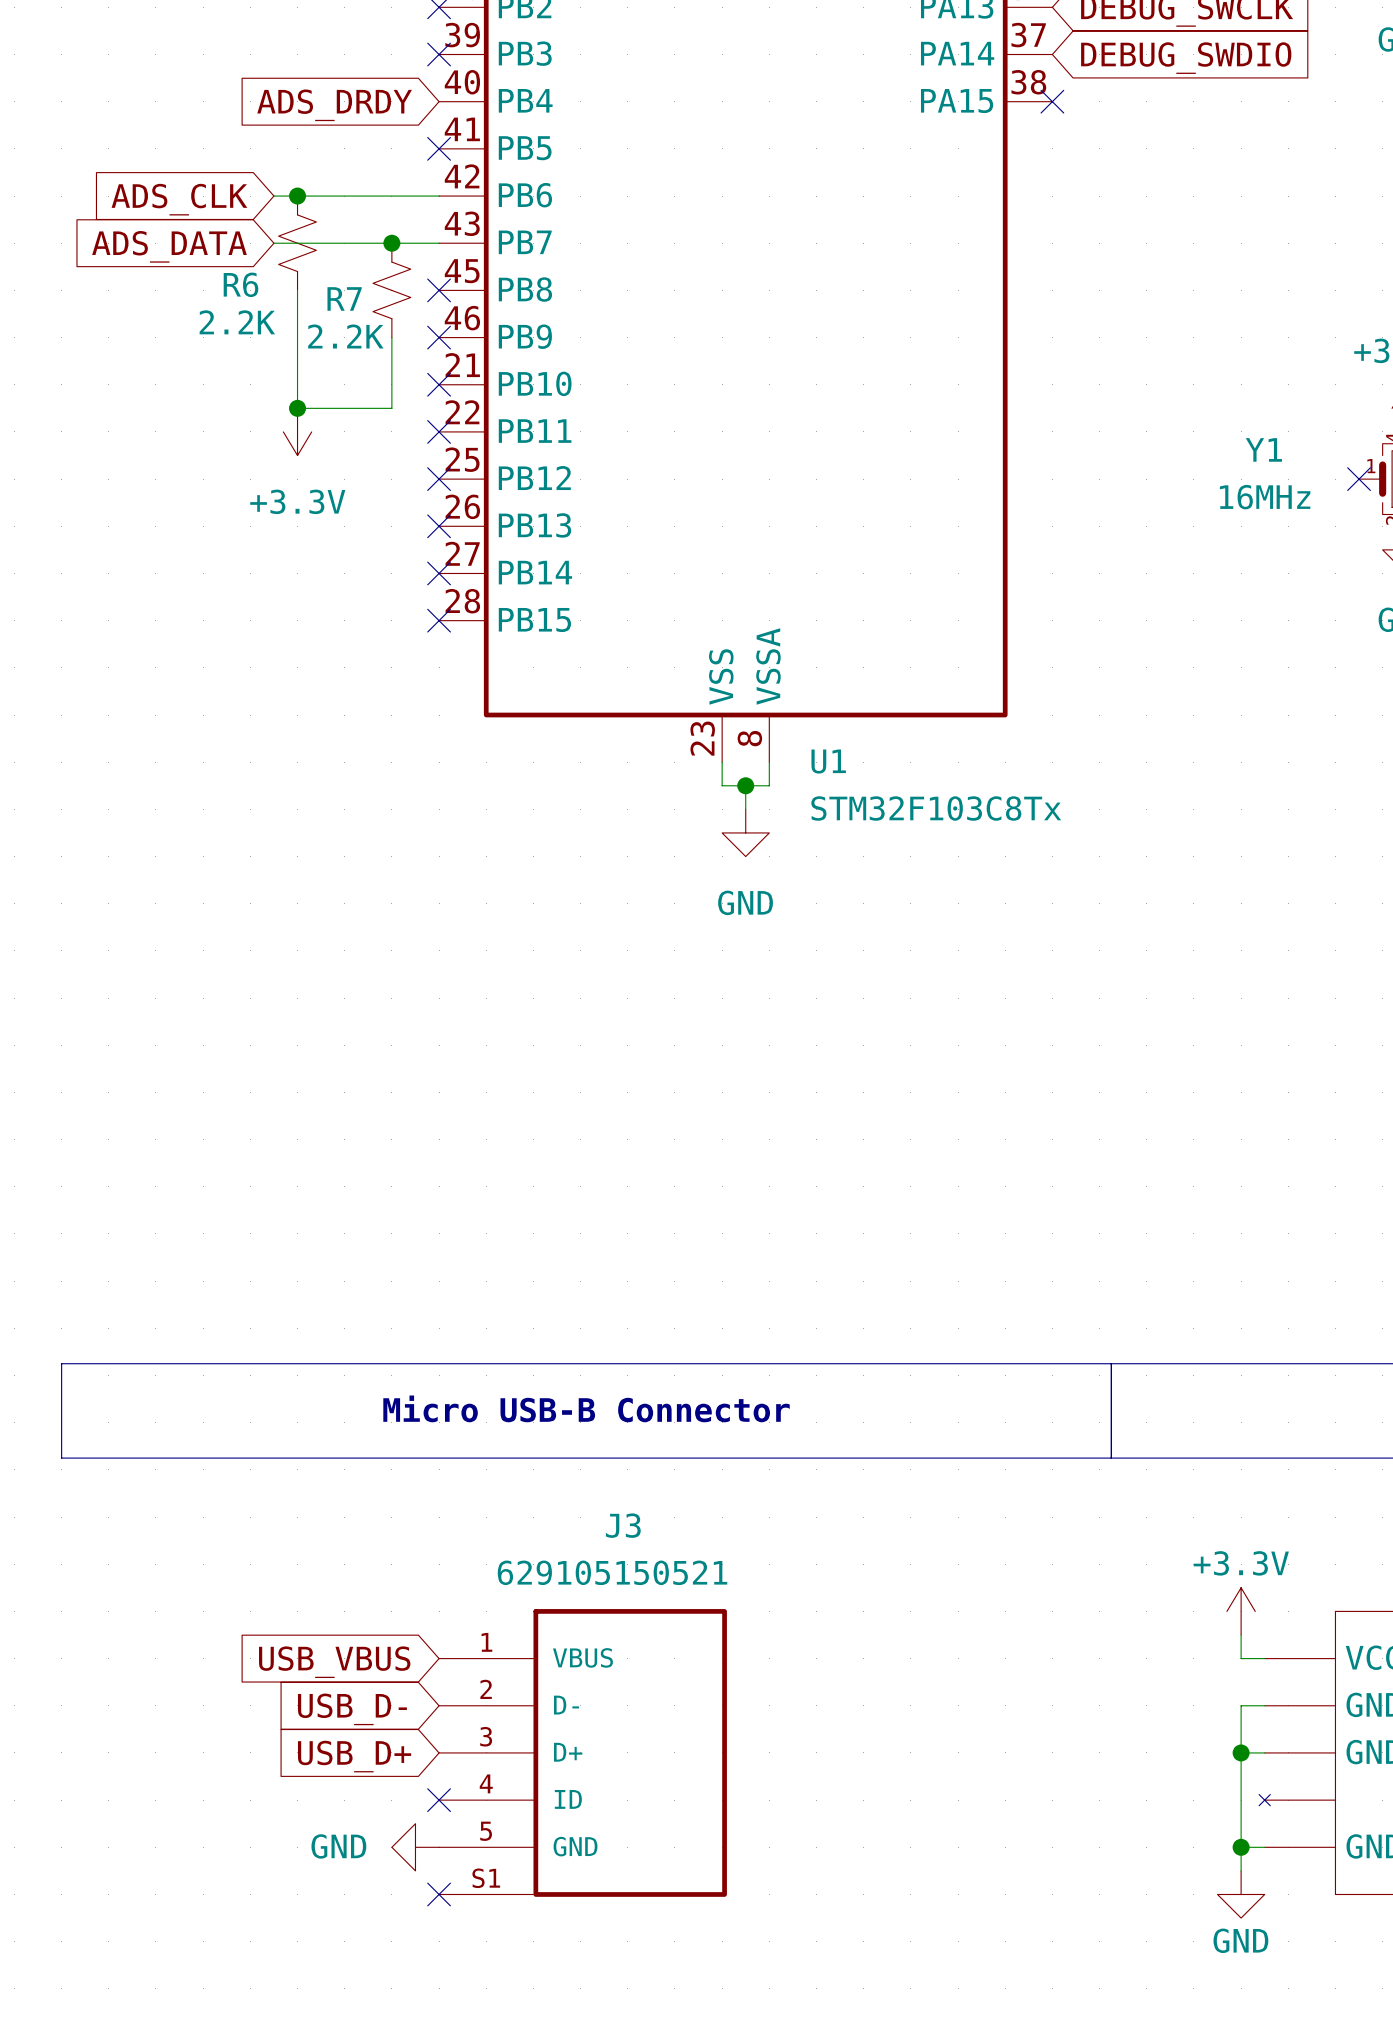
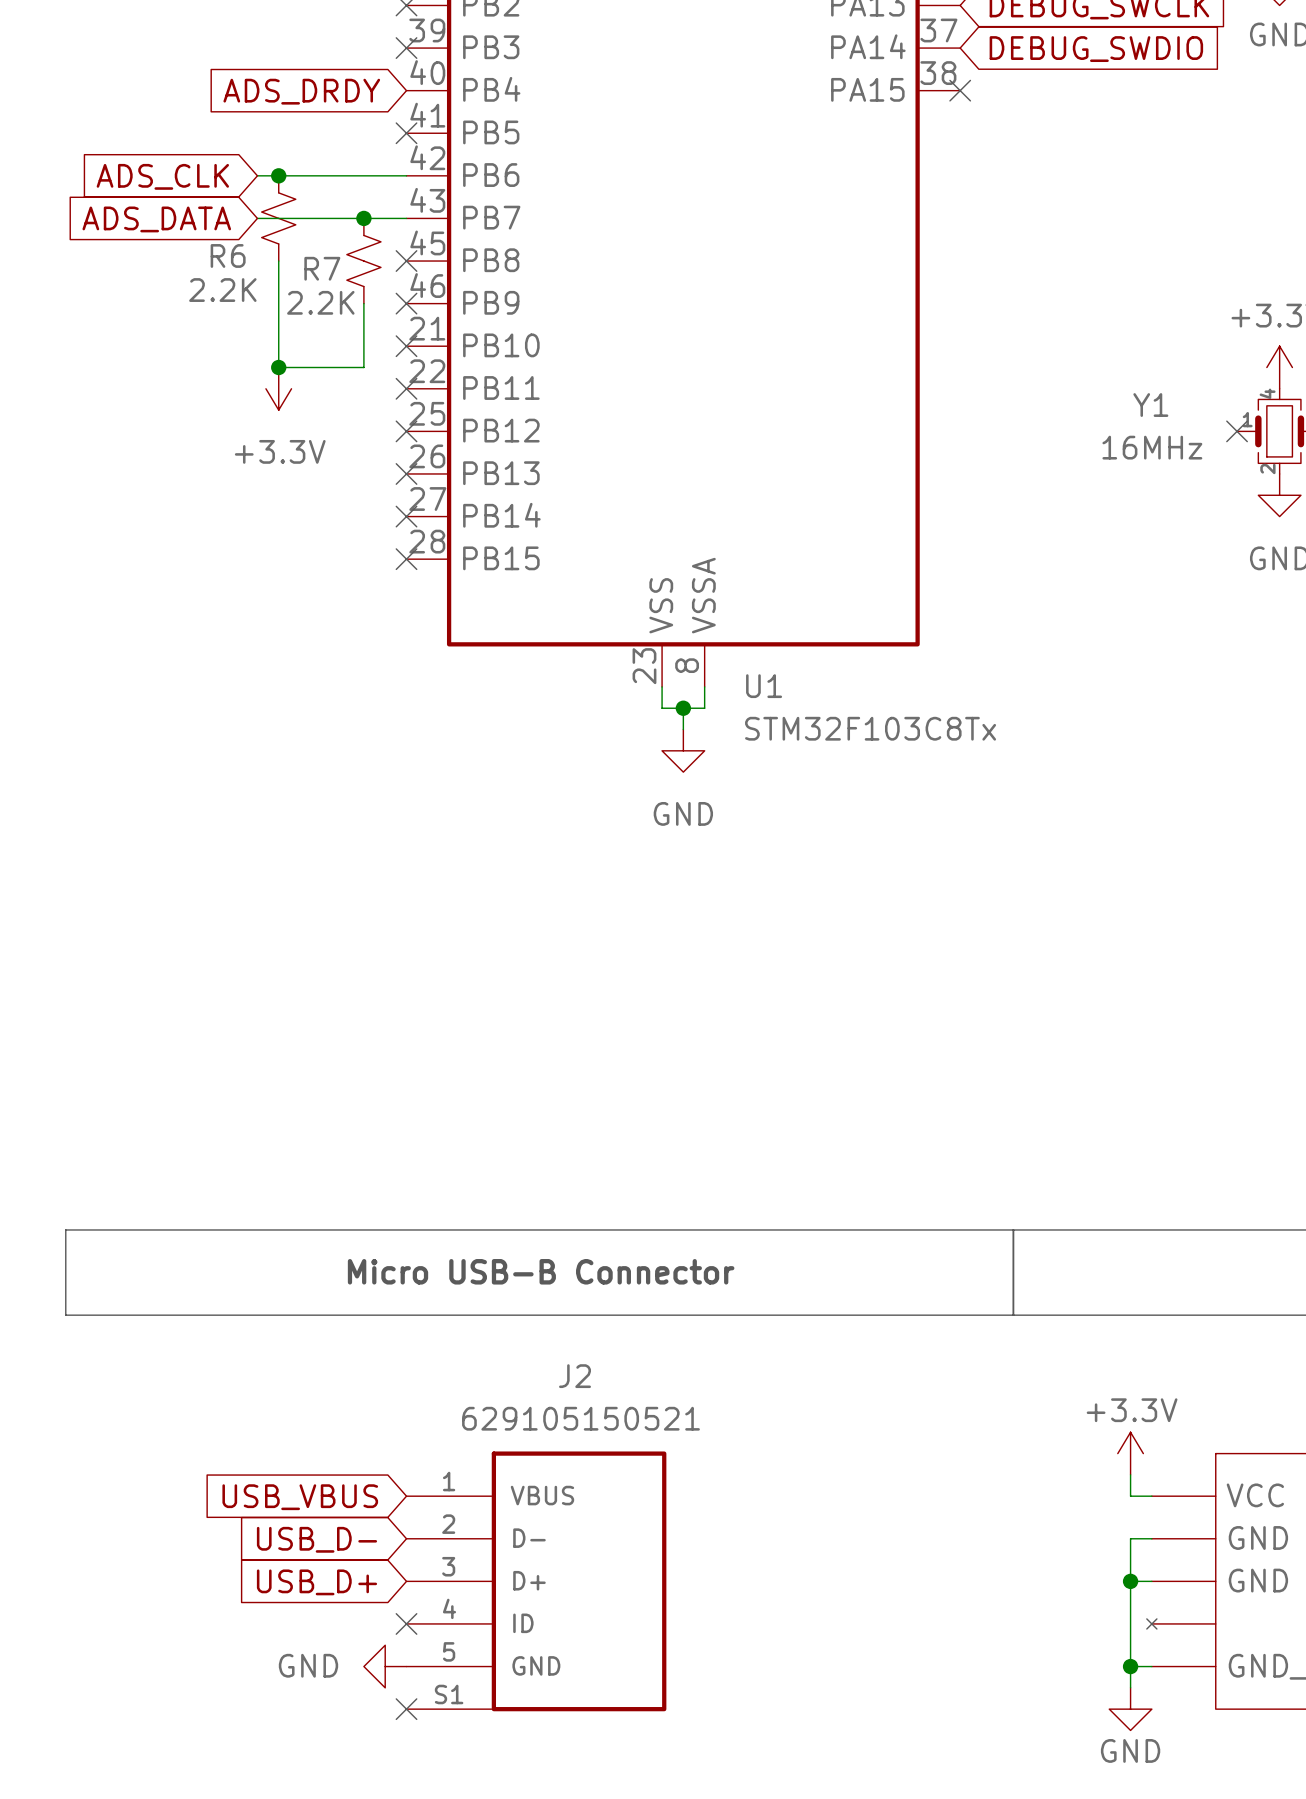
J3 name: J3 (623, 1525) -> J2 (575, 1376)

